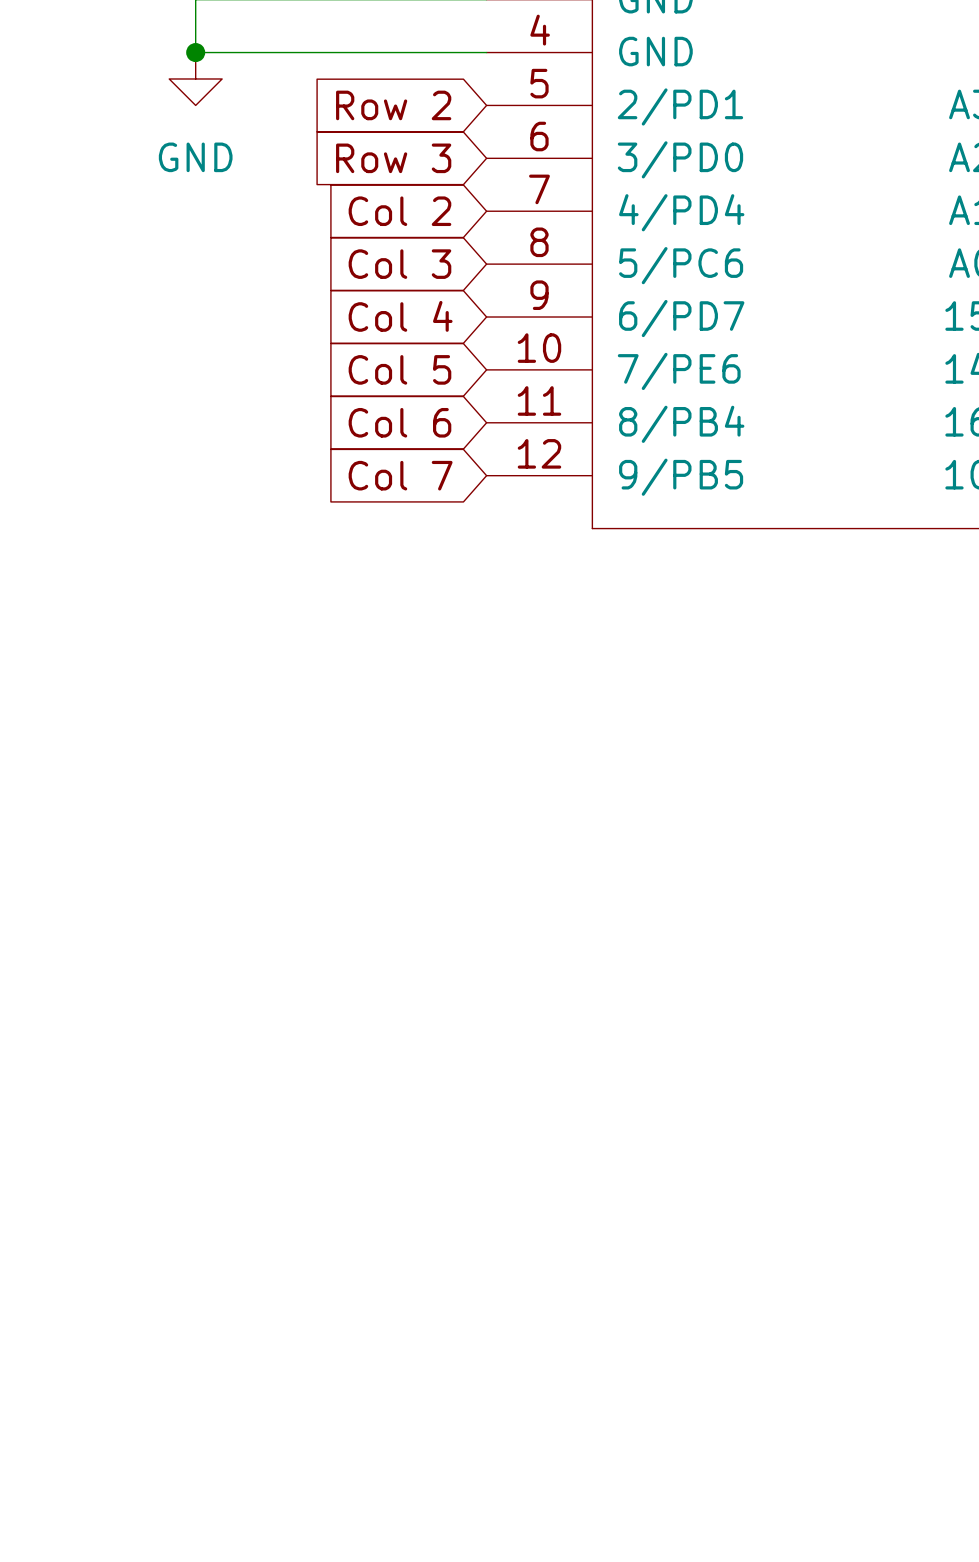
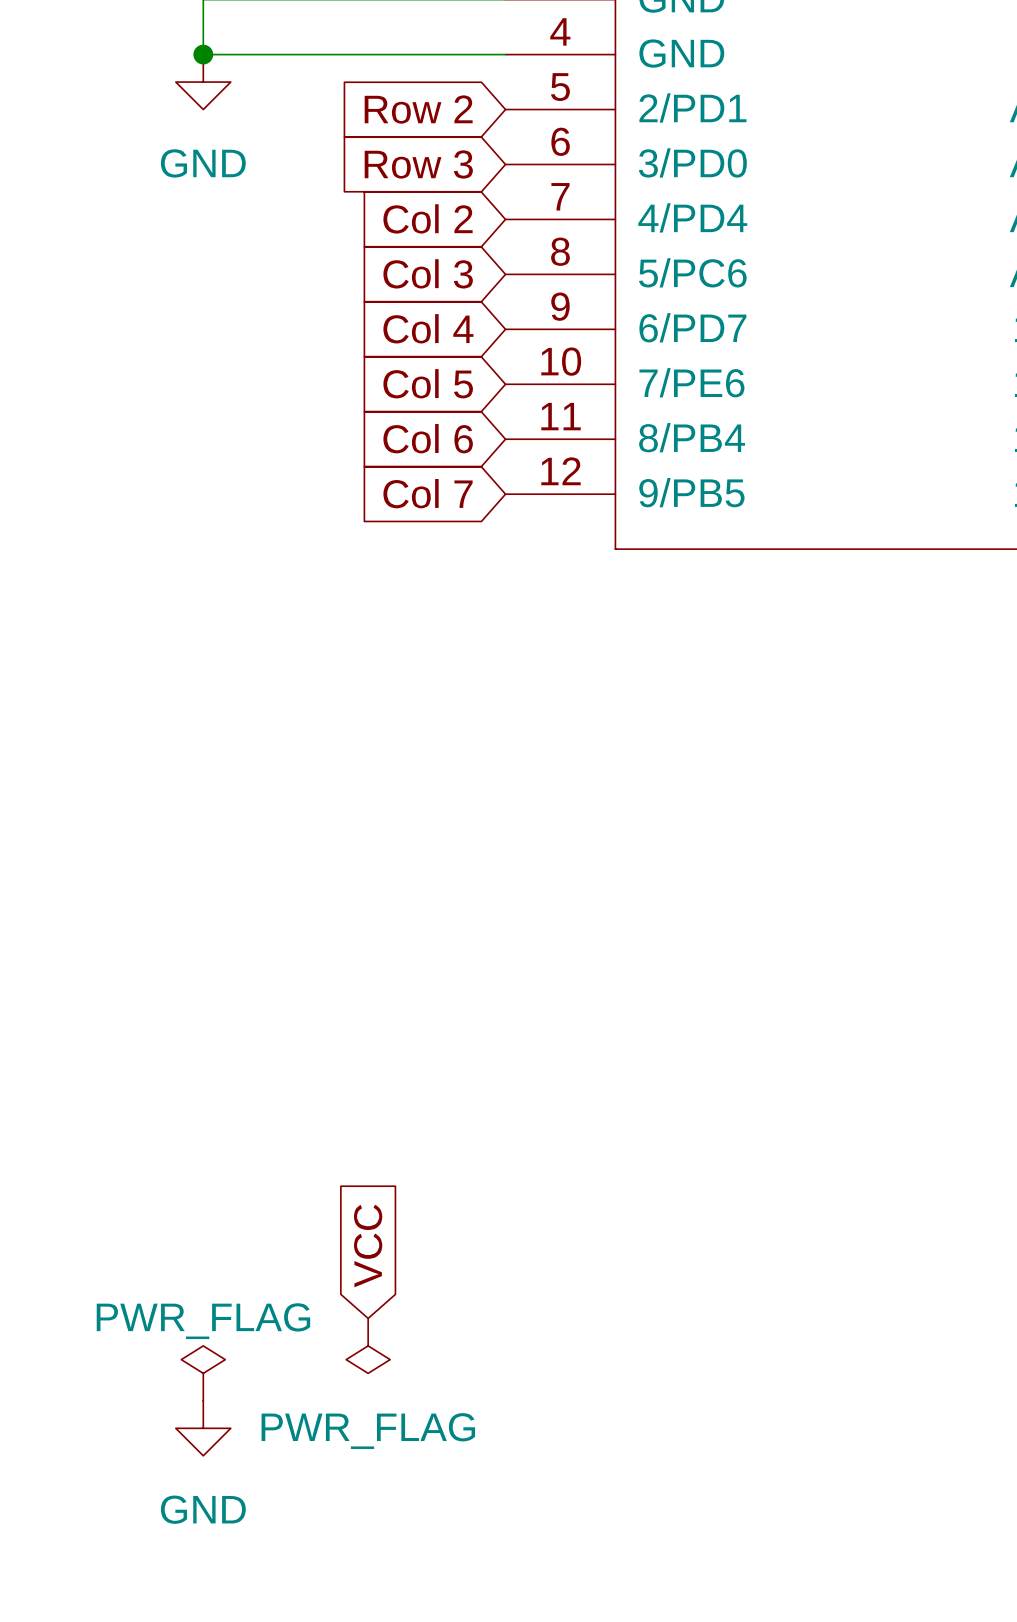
global label: none -> VCC (368, 1246)
power symbol: none -> PWR_FLAG (368, 1345)
power symbol: none -> PWR_FLAG (203, 1373)
power symbol: none -> GND (203, 1428)

